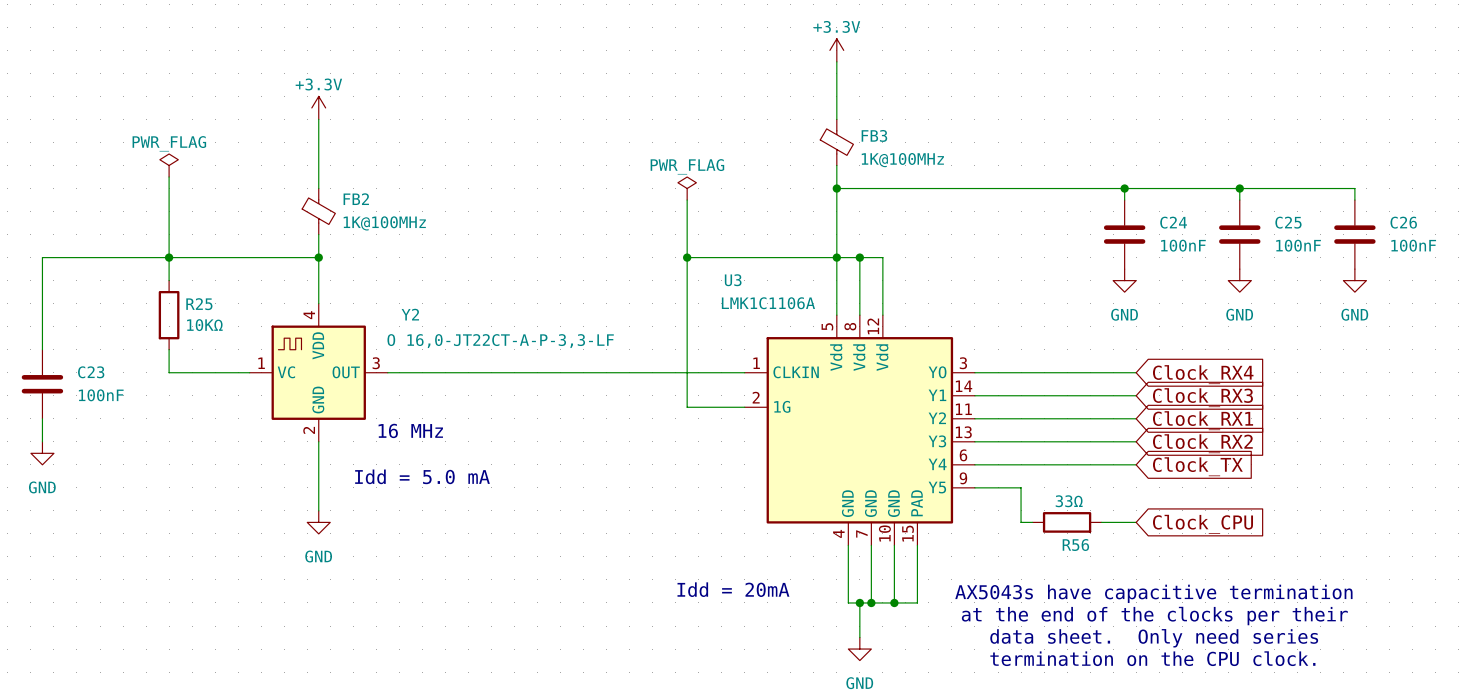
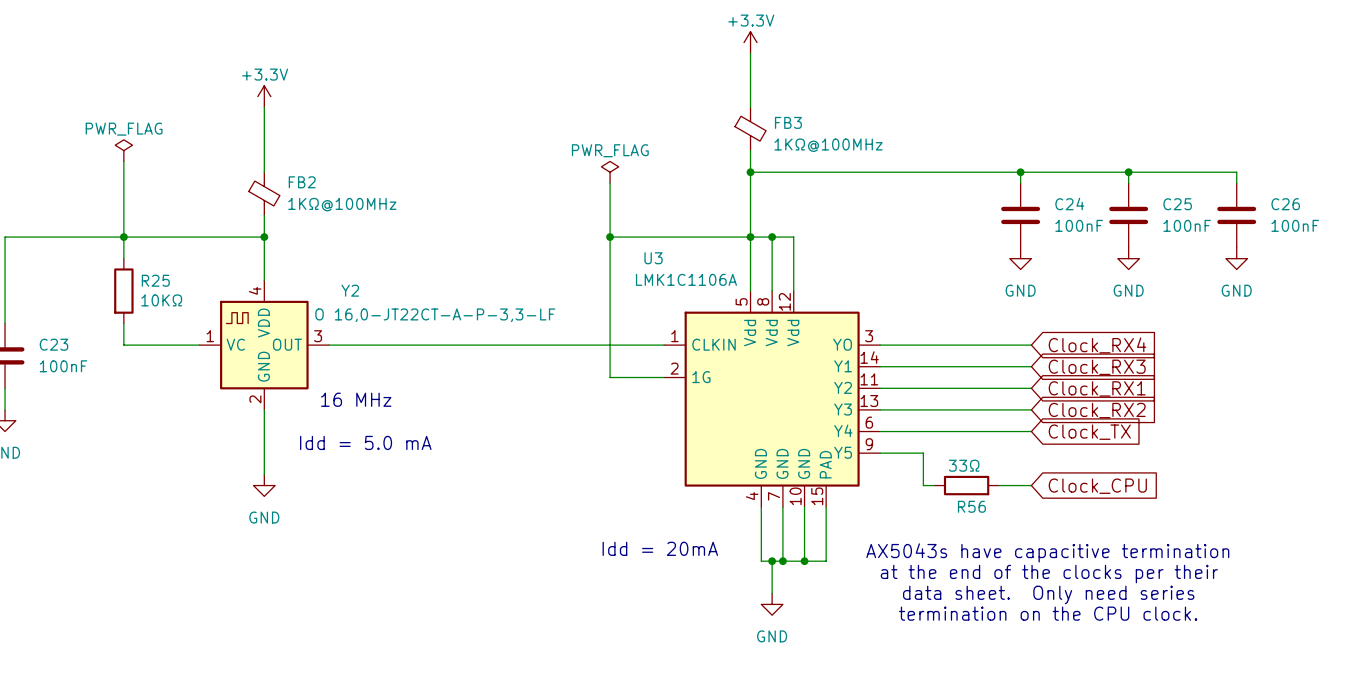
FB3 value: 1K@100MHz (902, 160) -> 1KΩ@100MHz (828, 145)
FB2 value: 1K@100MHz (384, 223) -> 1KΩ@100MHz (342, 204)

